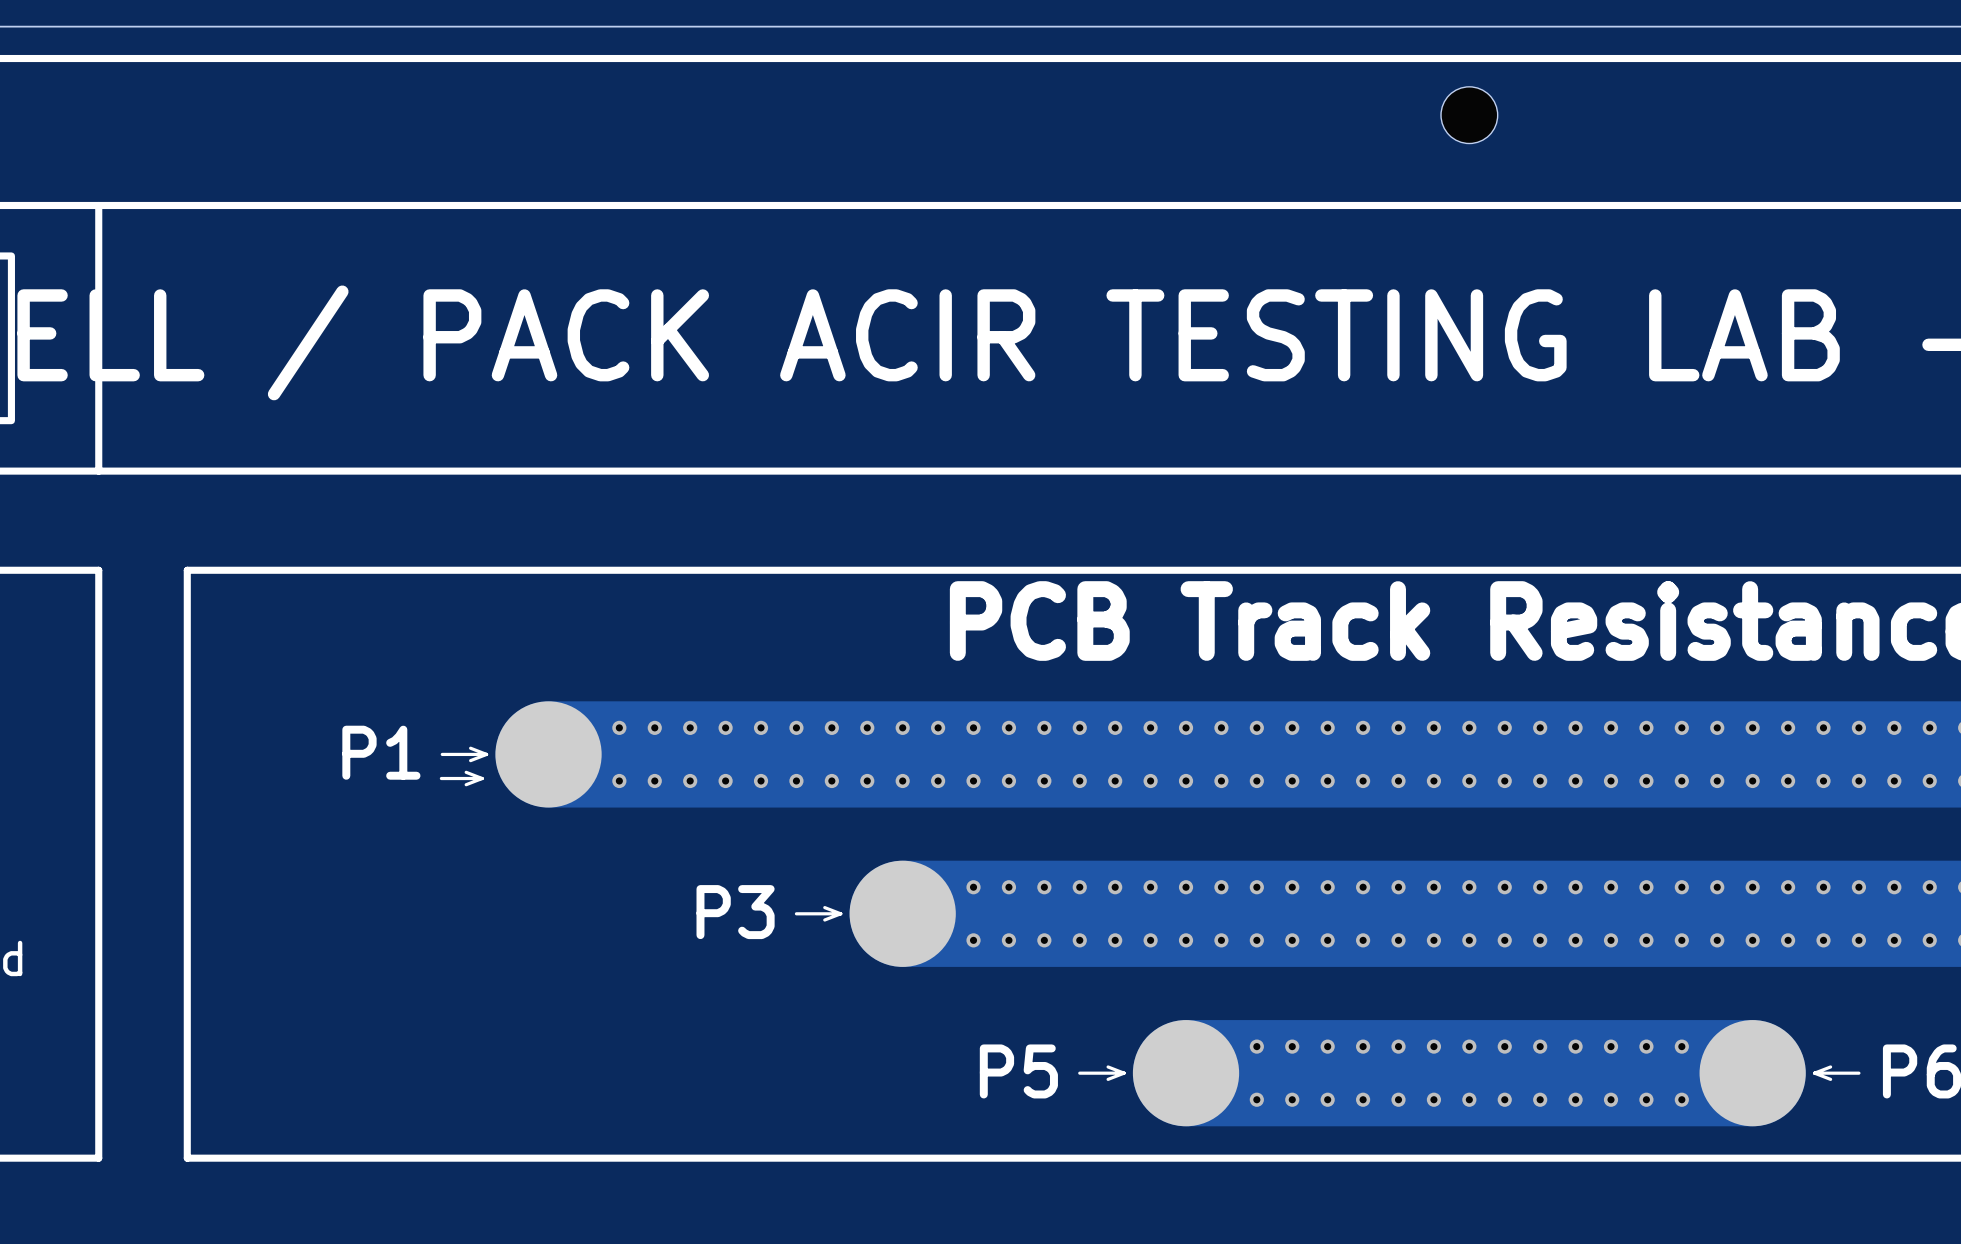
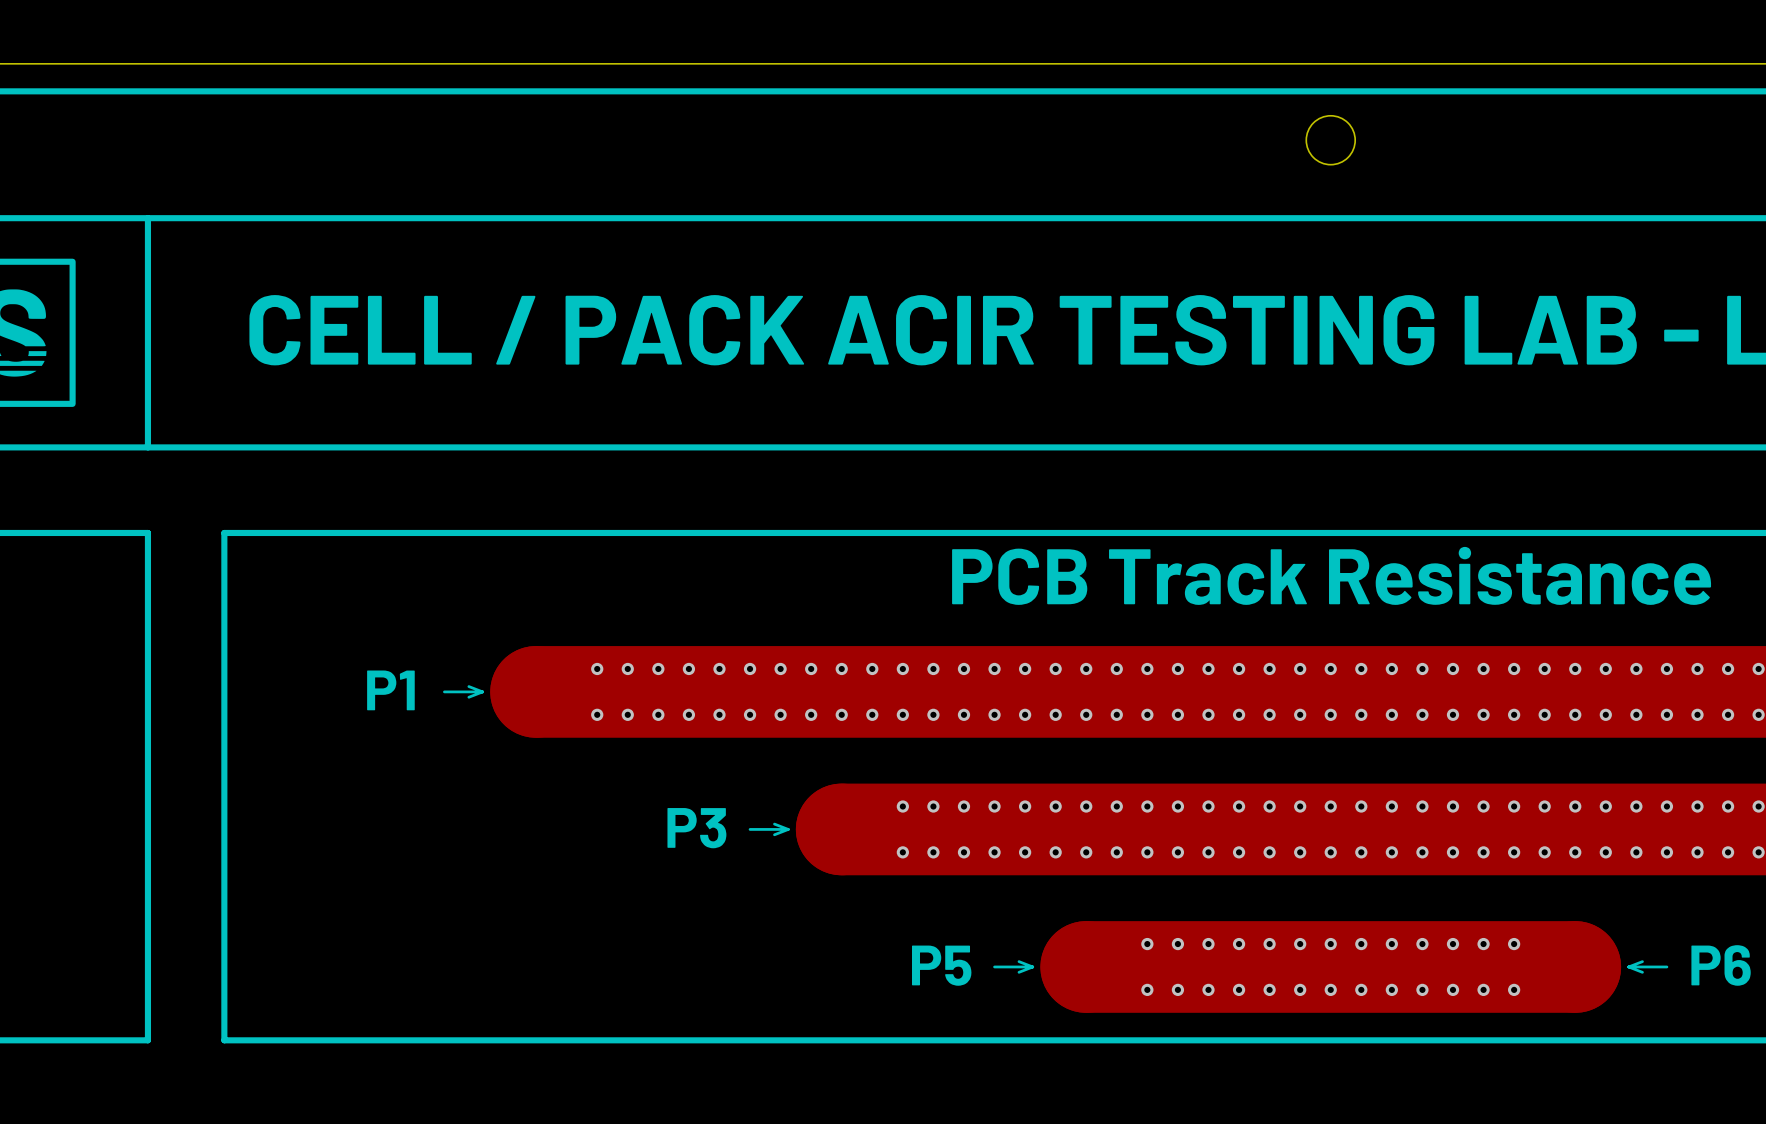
line: (466, 772) (482, 778) -> none
line: (441, 778) (482, 778) -> none
line: (482, 778) (466, 784) -> none

